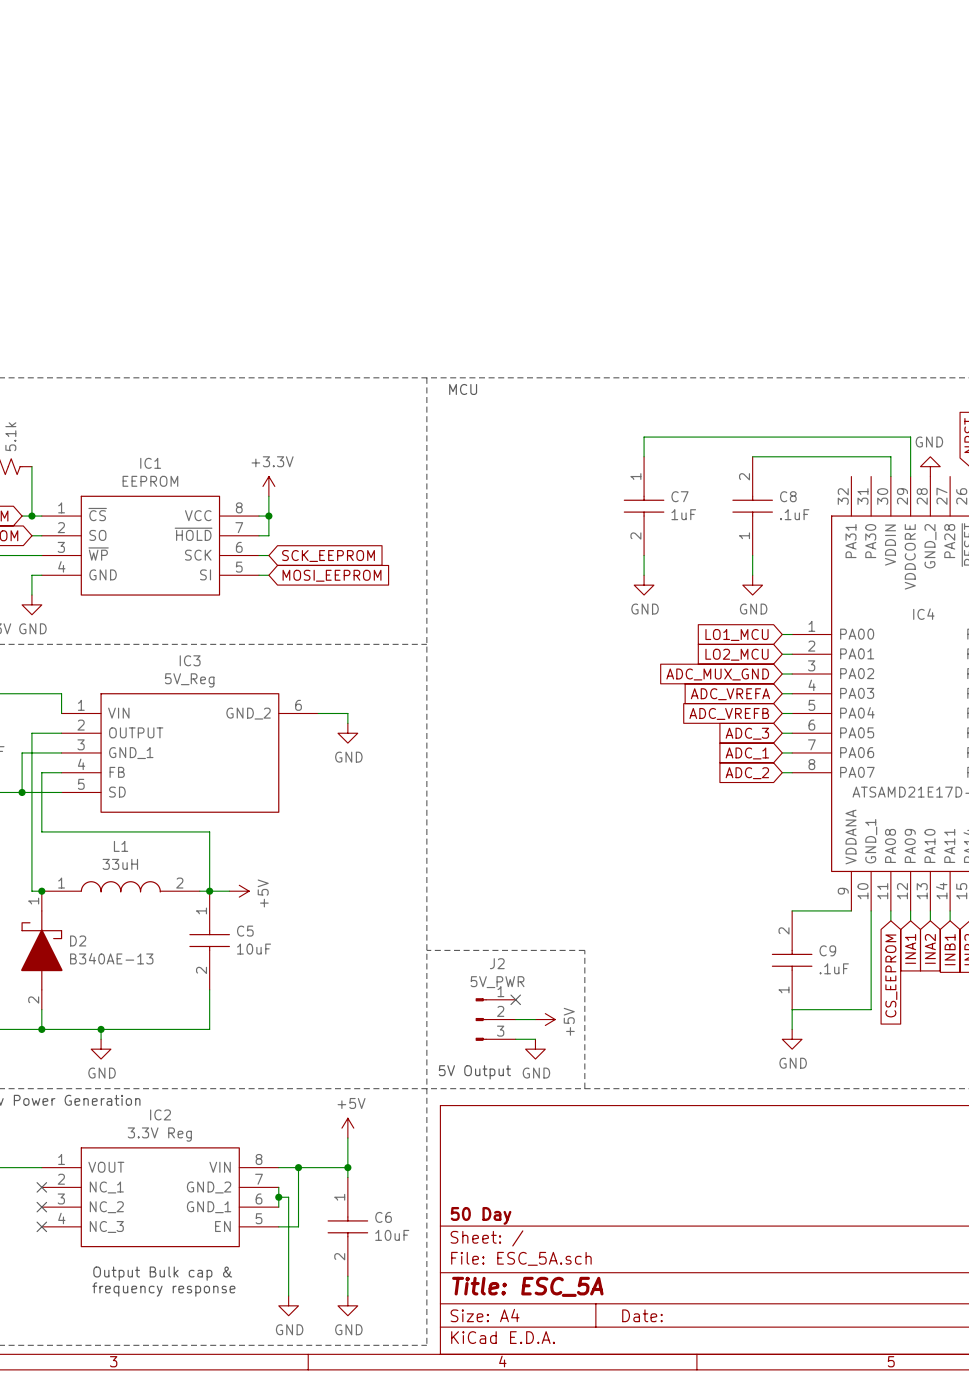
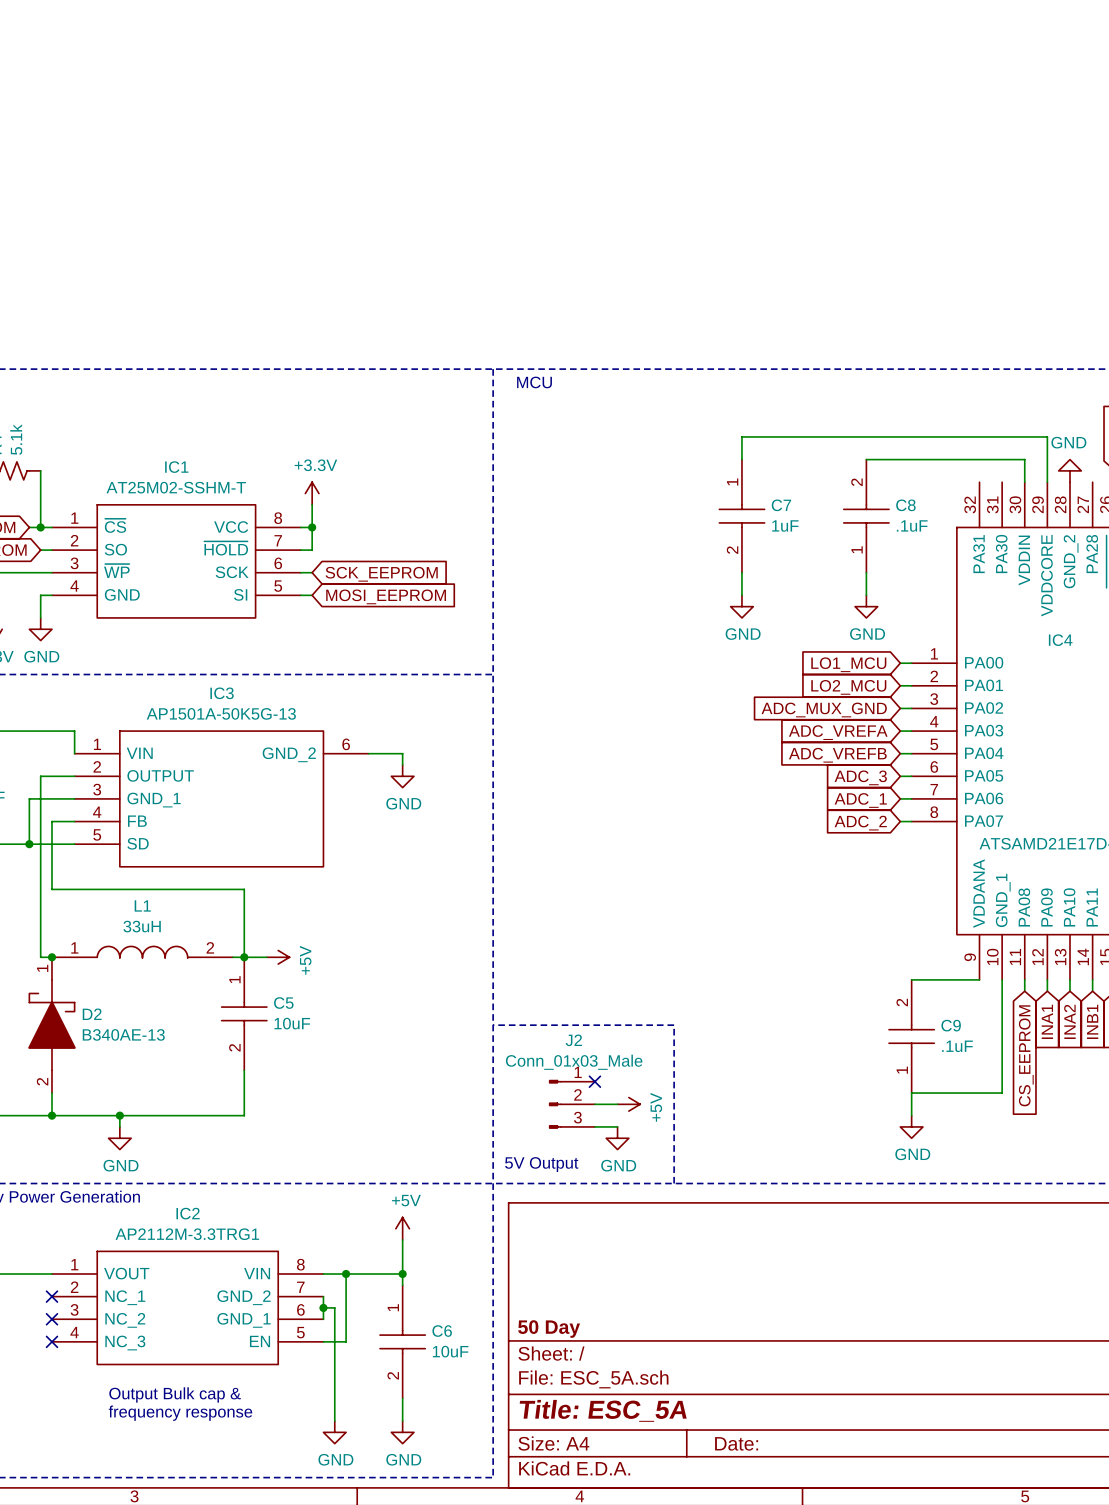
IC1 value: EEPROM (150, 481) -> AT25M02-SSHM-T (176, 487)
IC3 value: 5V_Reg (189, 680) -> AP1501A-50K5G-13 (221, 713)
J2 value: 5V_PWR (497, 982) -> Conn_01x03_Male (574, 1062)
IC2 value: 3.3V Reg (159, 1134) -> AP2112M-3.3TRG1 (187, 1234)

